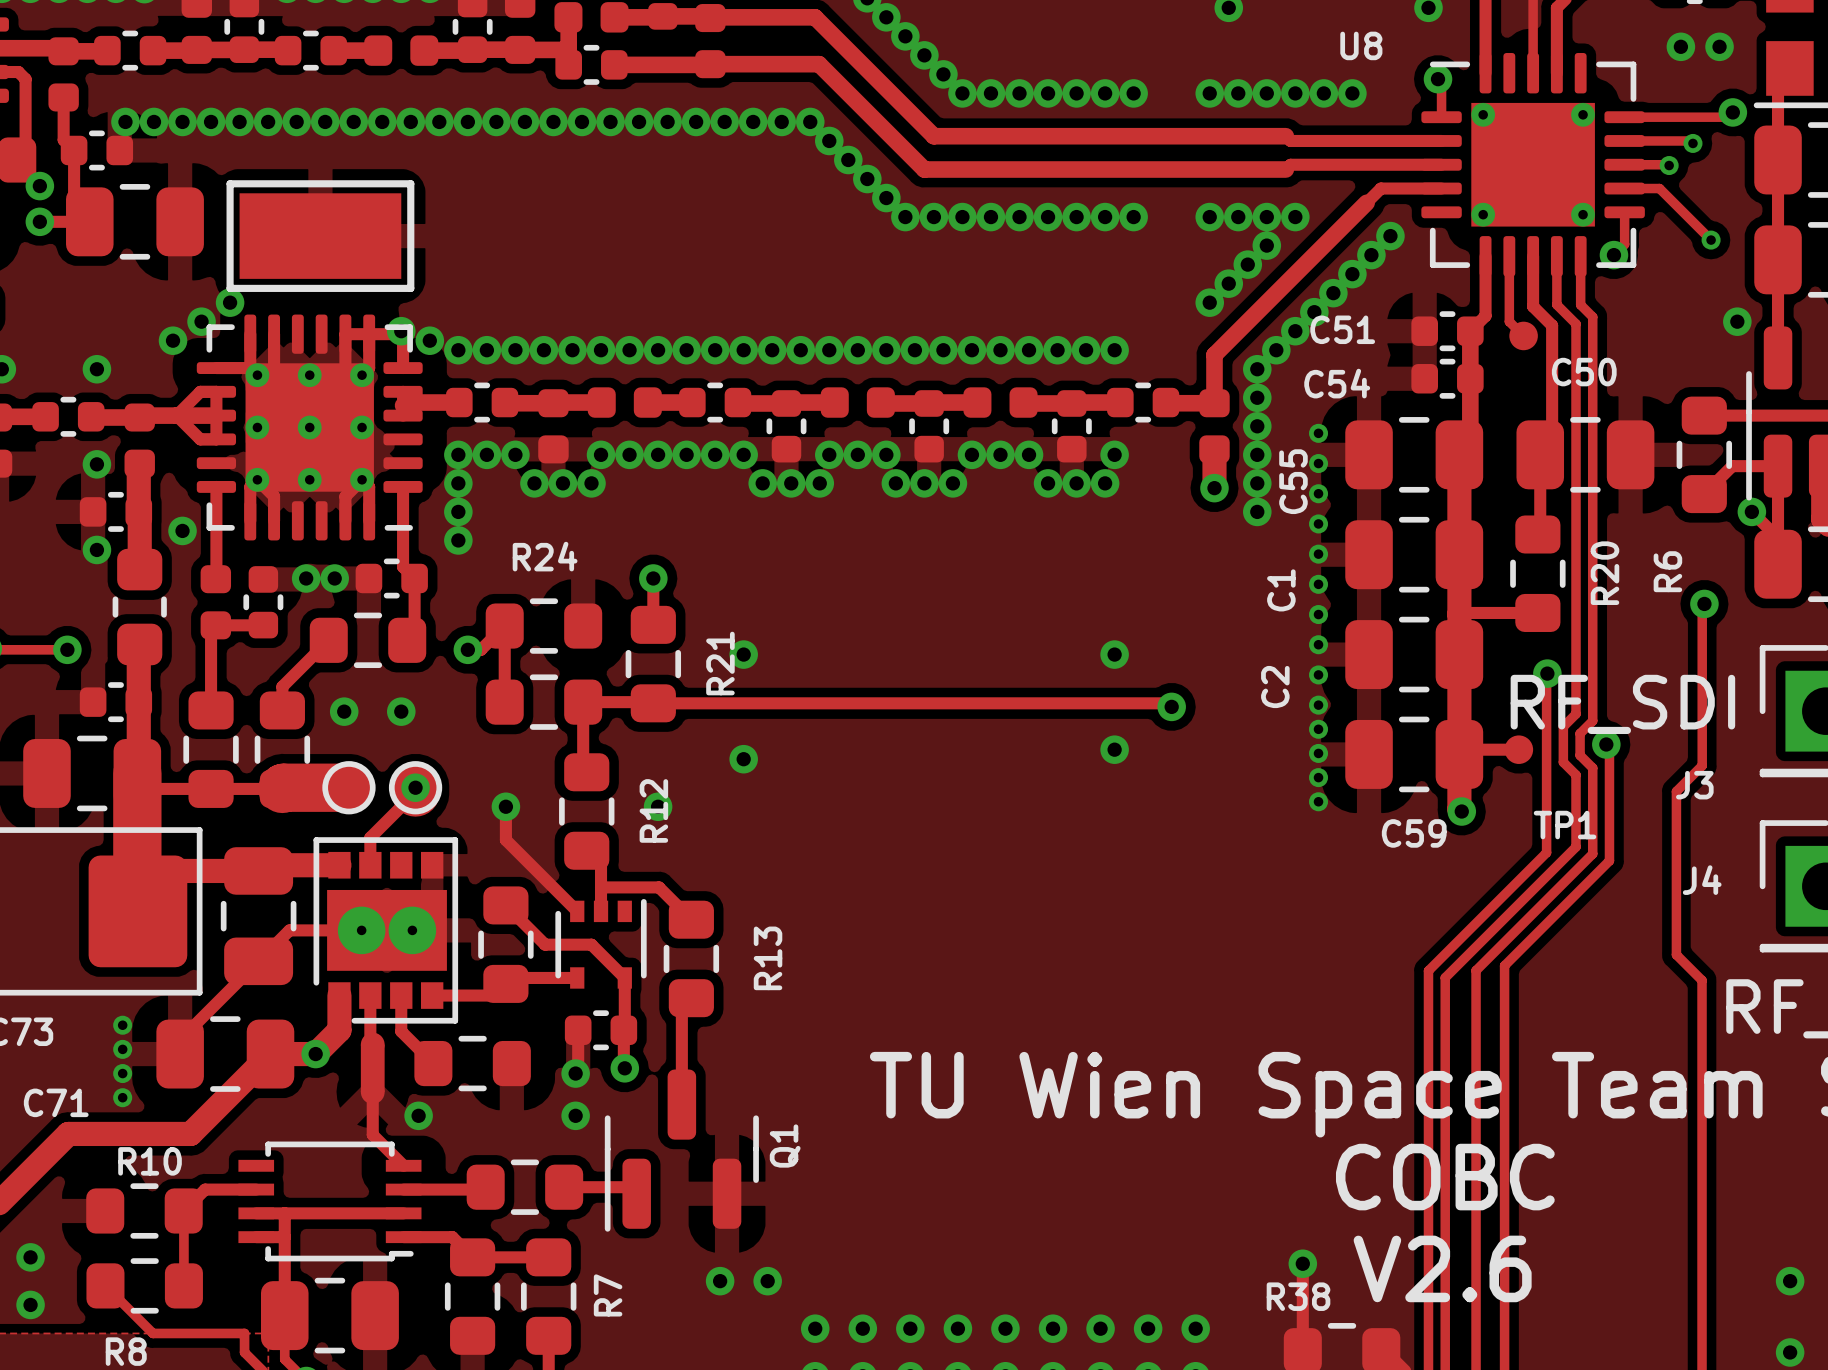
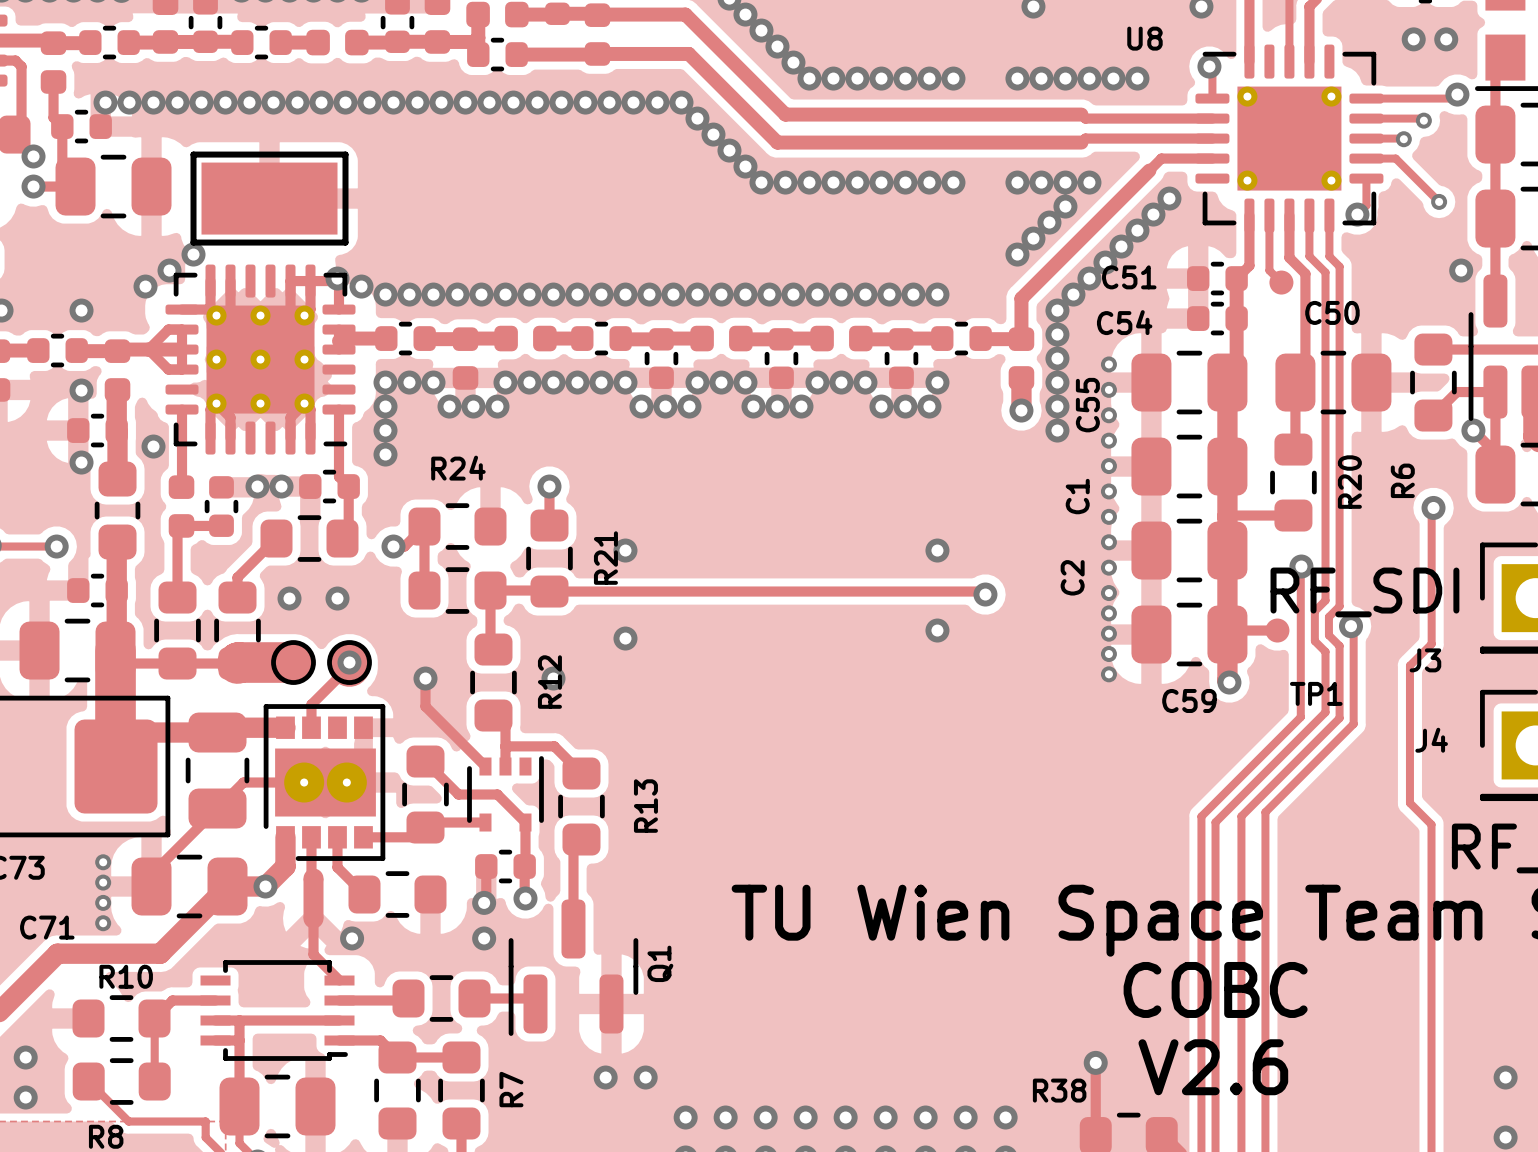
R38 name position: R38 (1298, 1296) -> R38 (1059, 1090)

